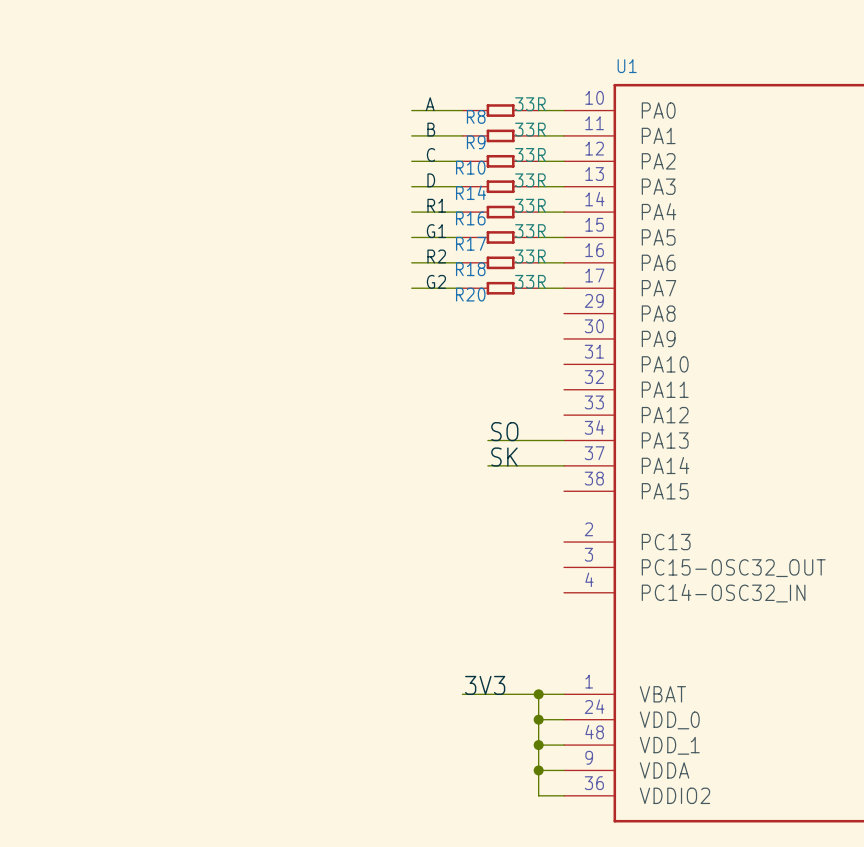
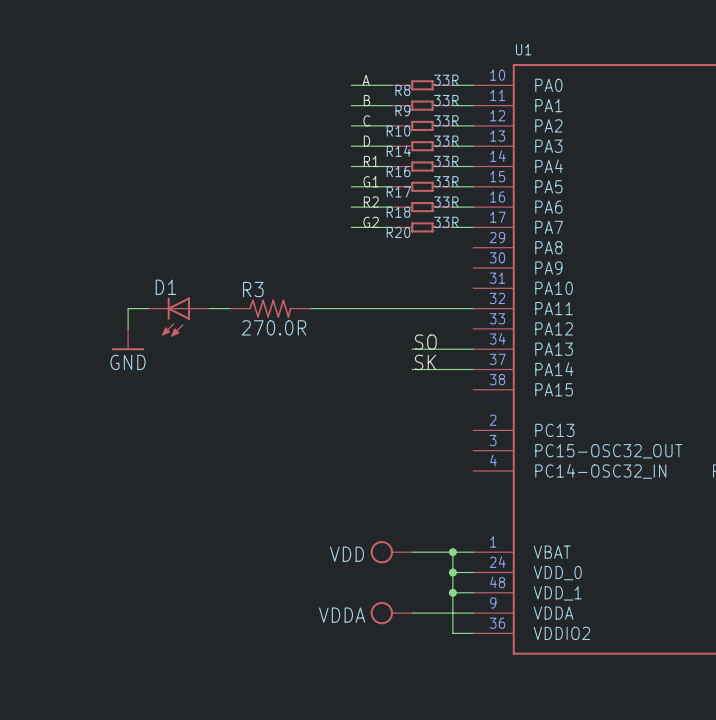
wire: none -> (148, 308) (128, 308) (128, 328)
wire: none -> (209, 308) (229, 308)
R3: none -> 270.0R (270, 308)
wire: none -> (310, 308) (473, 308)
D1: none -> (178, 317)
power symbol: none -> GND (128, 339)
label: 3V3 (485, 685) -> none
power symbol: none -> VDD (391, 552)
power symbol: none -> VDDA (391, 613)
wire: none -> (412, 613) (452, 613)
junction: (538, 770) -> none

